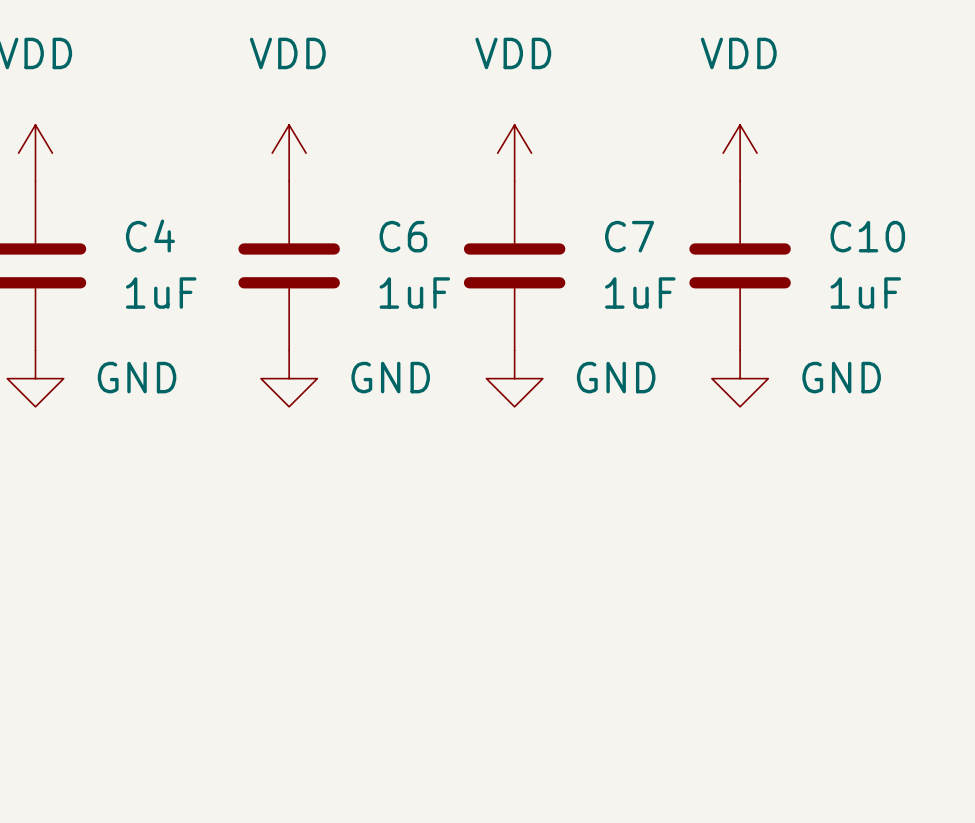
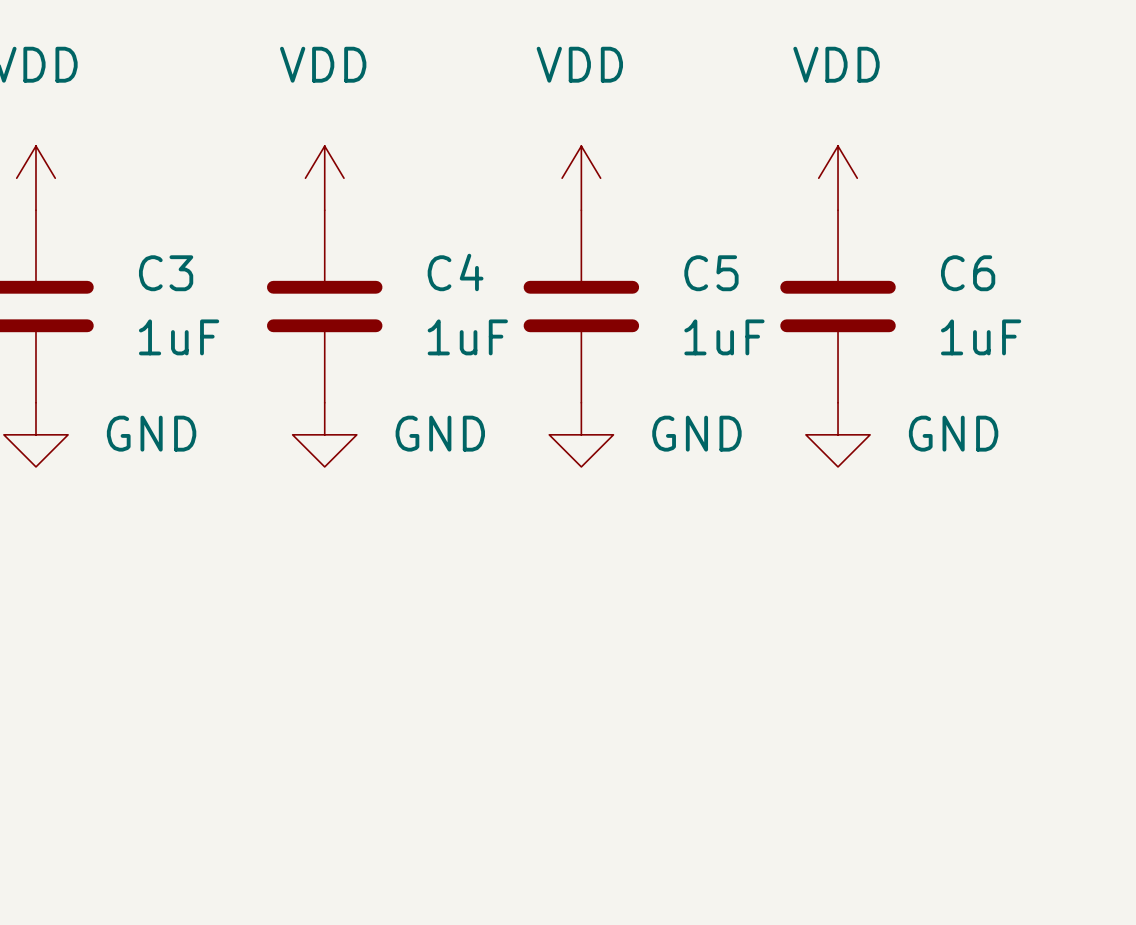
C4 name: C4 (150, 235) -> C3 (166, 273)
C6 name: C6 (403, 236) -> C4 (455, 272)
C7 name: C7 (629, 236) -> C5 (711, 273)
C10 name: C10 (867, 236) -> C6 (968, 273)

